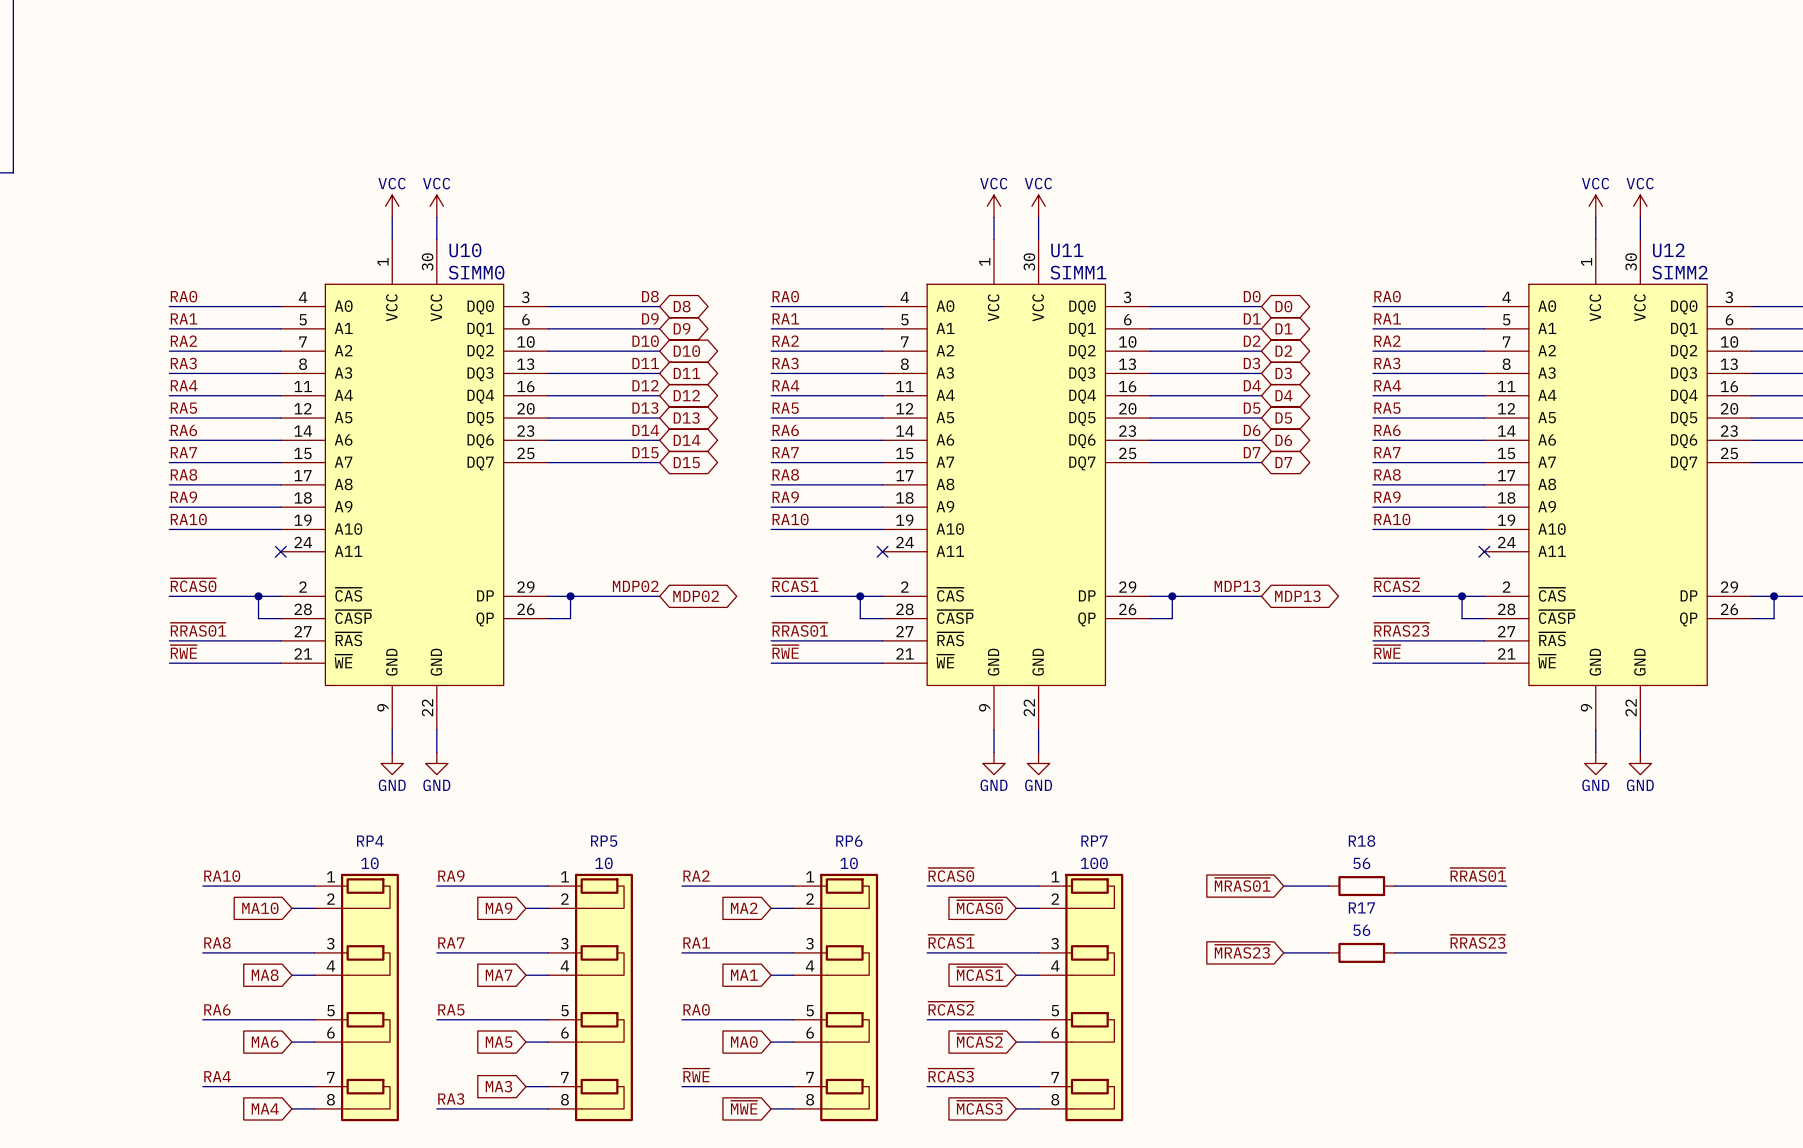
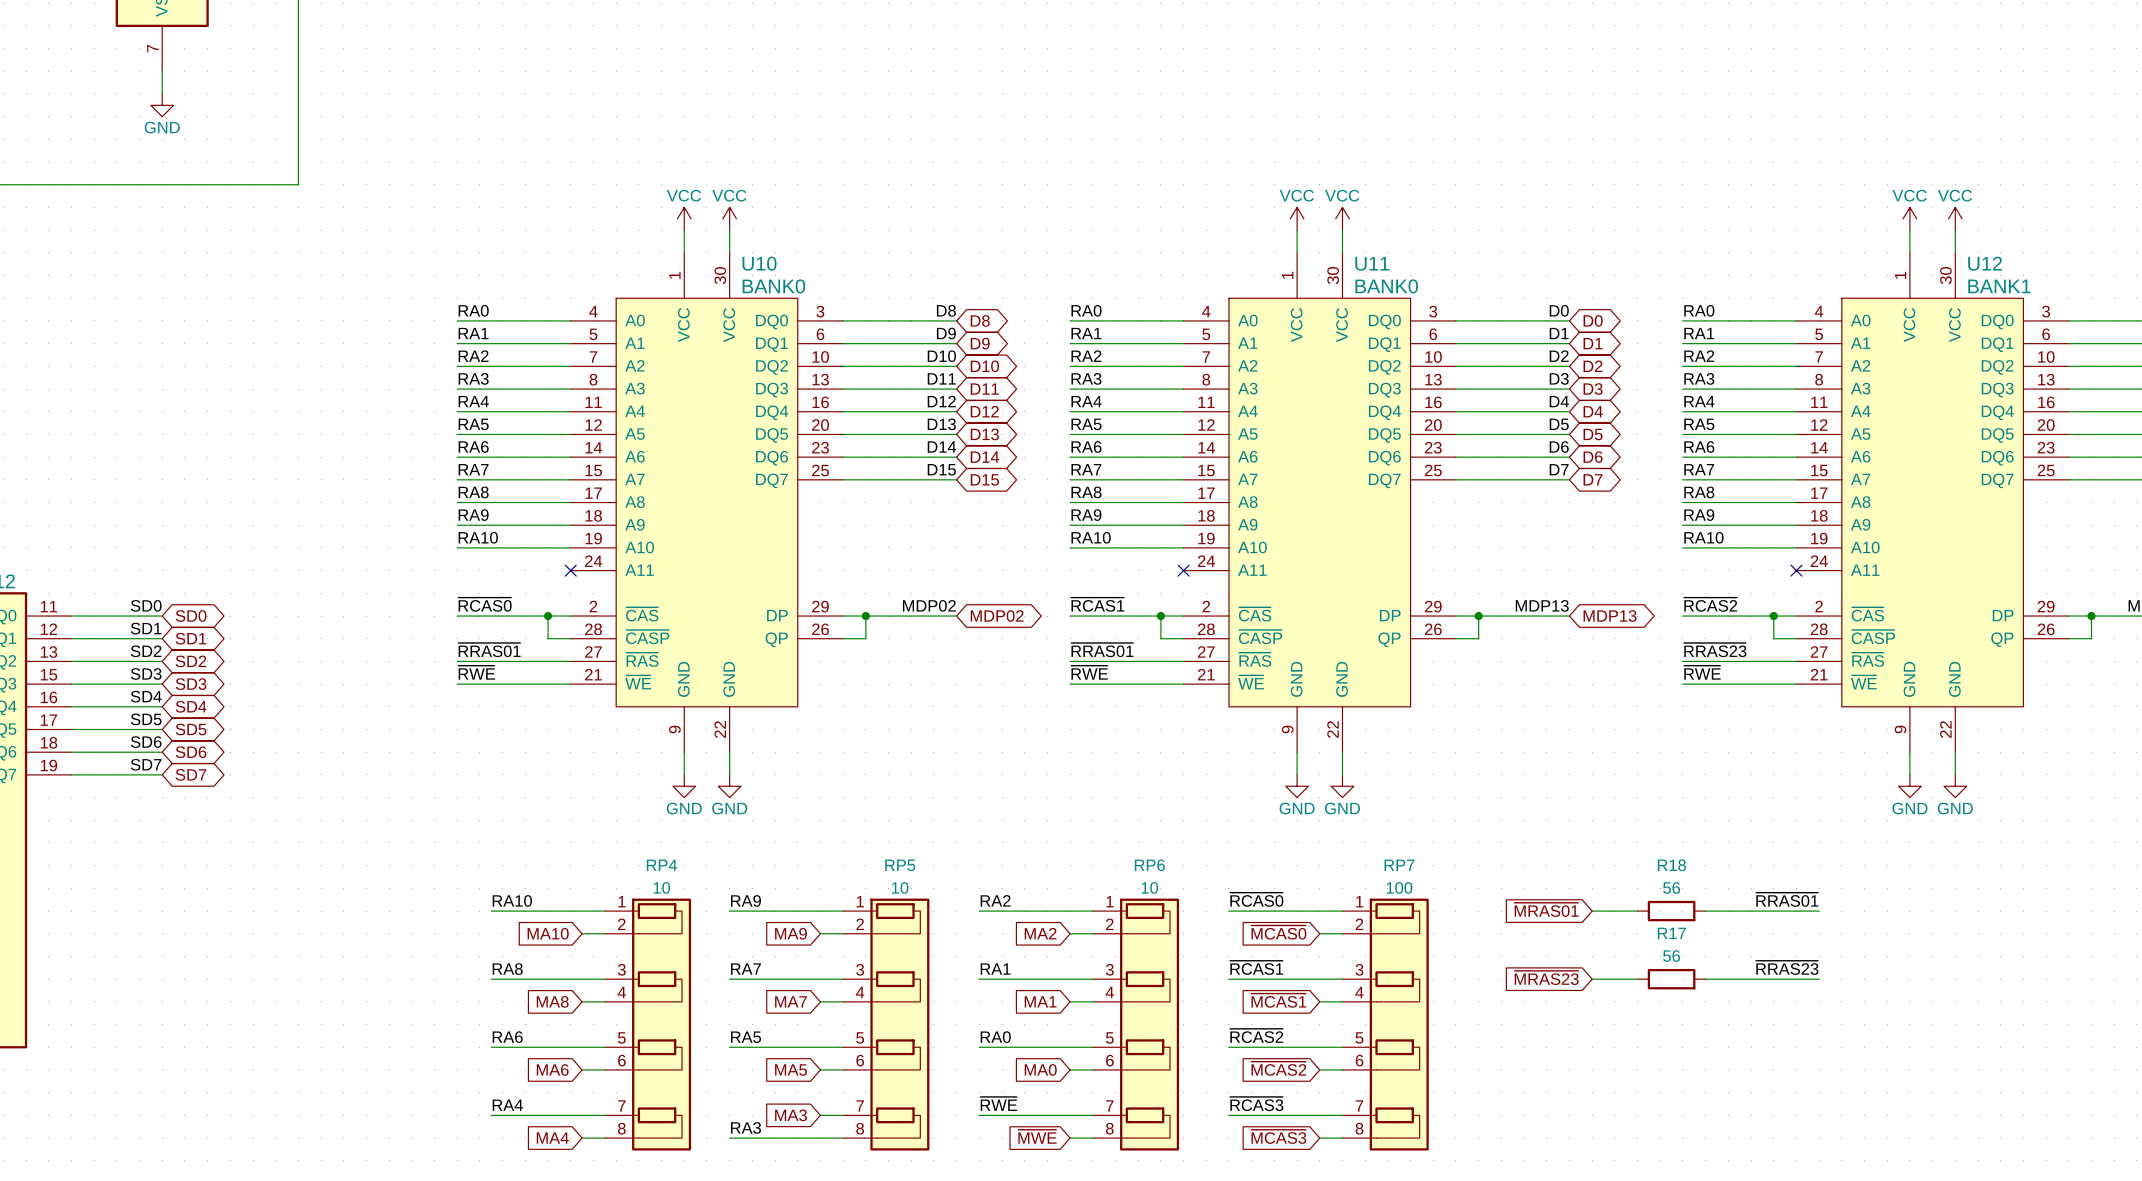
U10 value: SIMM0 (476, 272) -> BANK0 (773, 286)
U11 value: SIMM1 (1078, 272) -> BANK0 (1386, 286)
U12 value: SIMM2 (1680, 272) -> BANK1 (1999, 286)

